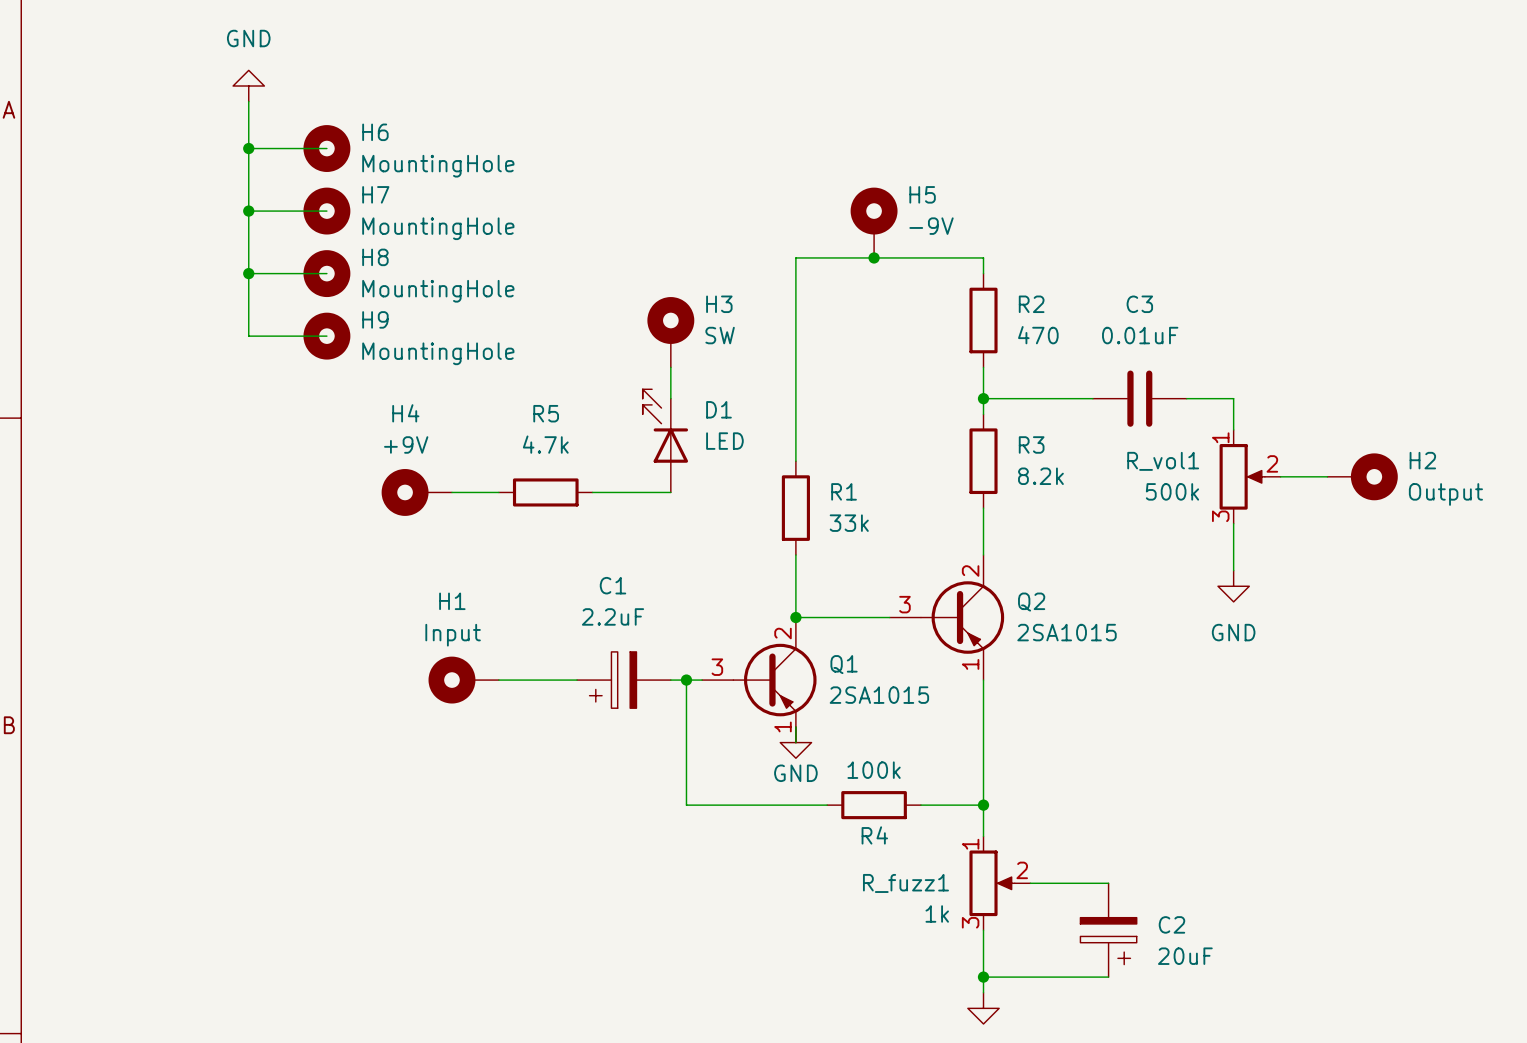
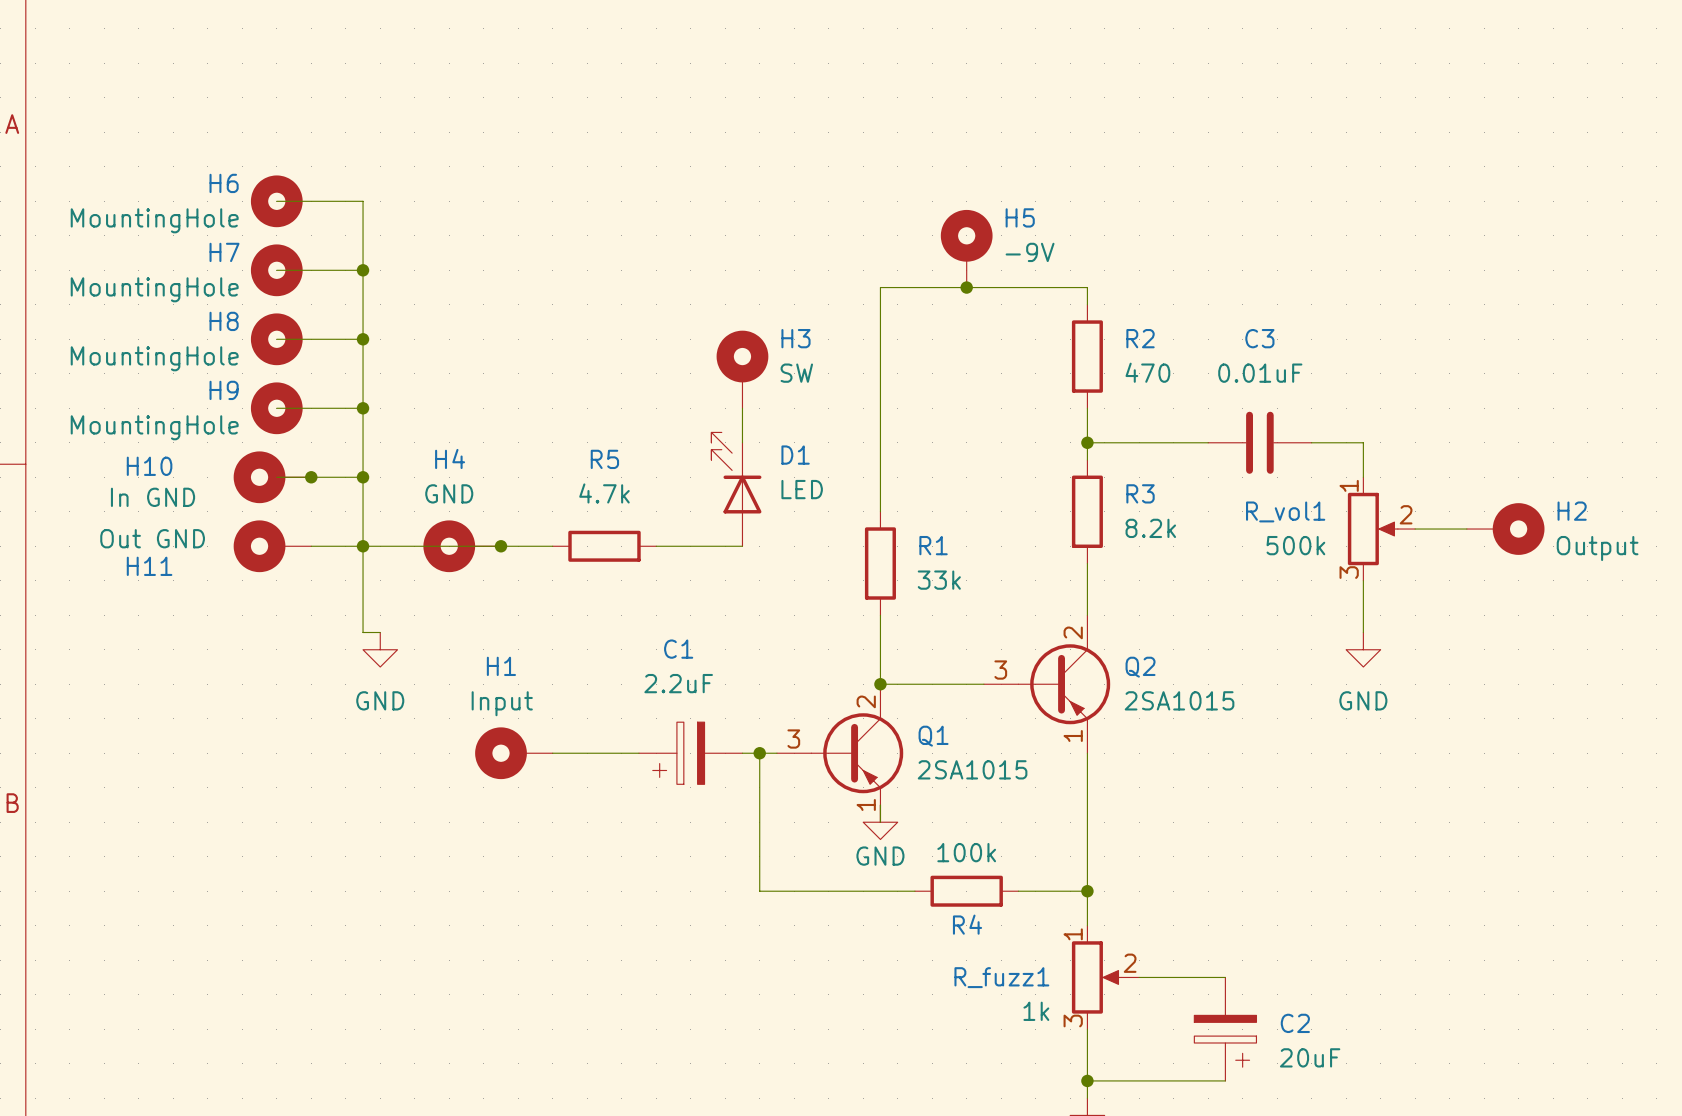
power symbol: GND (248, 86) -> none
wire: (248, 101) (248, 336) (326, 336) -> none
H6 name position: H6 (375, 132) -> H6 (224, 183)
wire: (248, 148) (326, 148) -> (276, 270) (363, 270)
junction: (248, 148) -> none
H6 position: (326, 148) -> (276, 201)
H6 value position: MountingHole (438, 166) -> MountingHole (154, 220)
wire: none -> (276, 201) (363, 201) (363, 632) (380, 632)
H7 name position: H7 (375, 194) -> H7 (224, 252)
wire: (248, 211) (326, 211) -> (276, 339) (363, 339)
junction: (248, 211) -> none
H7 position: (326, 211) -> (276, 270)
H7 value position: MountingHole (438, 228) -> MountingHole (154, 289)
junction: none -> (363, 270)
H8 name position: H8 (375, 257) -> H8 (224, 321)
wire: (248, 273) (326, 273) -> (276, 408) (363, 408)
junction: (248, 273) -> none
H8 position: (326, 273) -> (276, 339)
H8 value position: MountingHole (438, 291) -> MountingHole (154, 358)
junction: none -> (363, 339)
H9 name position: H9 (375, 319) -> H9 (224, 390)
H9 position: (326, 336) -> (276, 408)
H9 value position: MountingHole (438, 353) -> MountingHole (154, 427)
junction: none -> (363, 408)
H10: none -> In GND (272, 477)
wire: none -> (276, 477) (363, 477)
junction: none -> (311, 477)
junction: none -> (363, 477)
H4 value: +9V (406, 444) -> GND (449, 493)
H11: none -> Out GND (272, 546)
wire: none -> (311, 546) (501, 546)
junction: none -> (363, 546)
junction: none -> (501, 546)
power symbol: none -> GND (380, 649)

